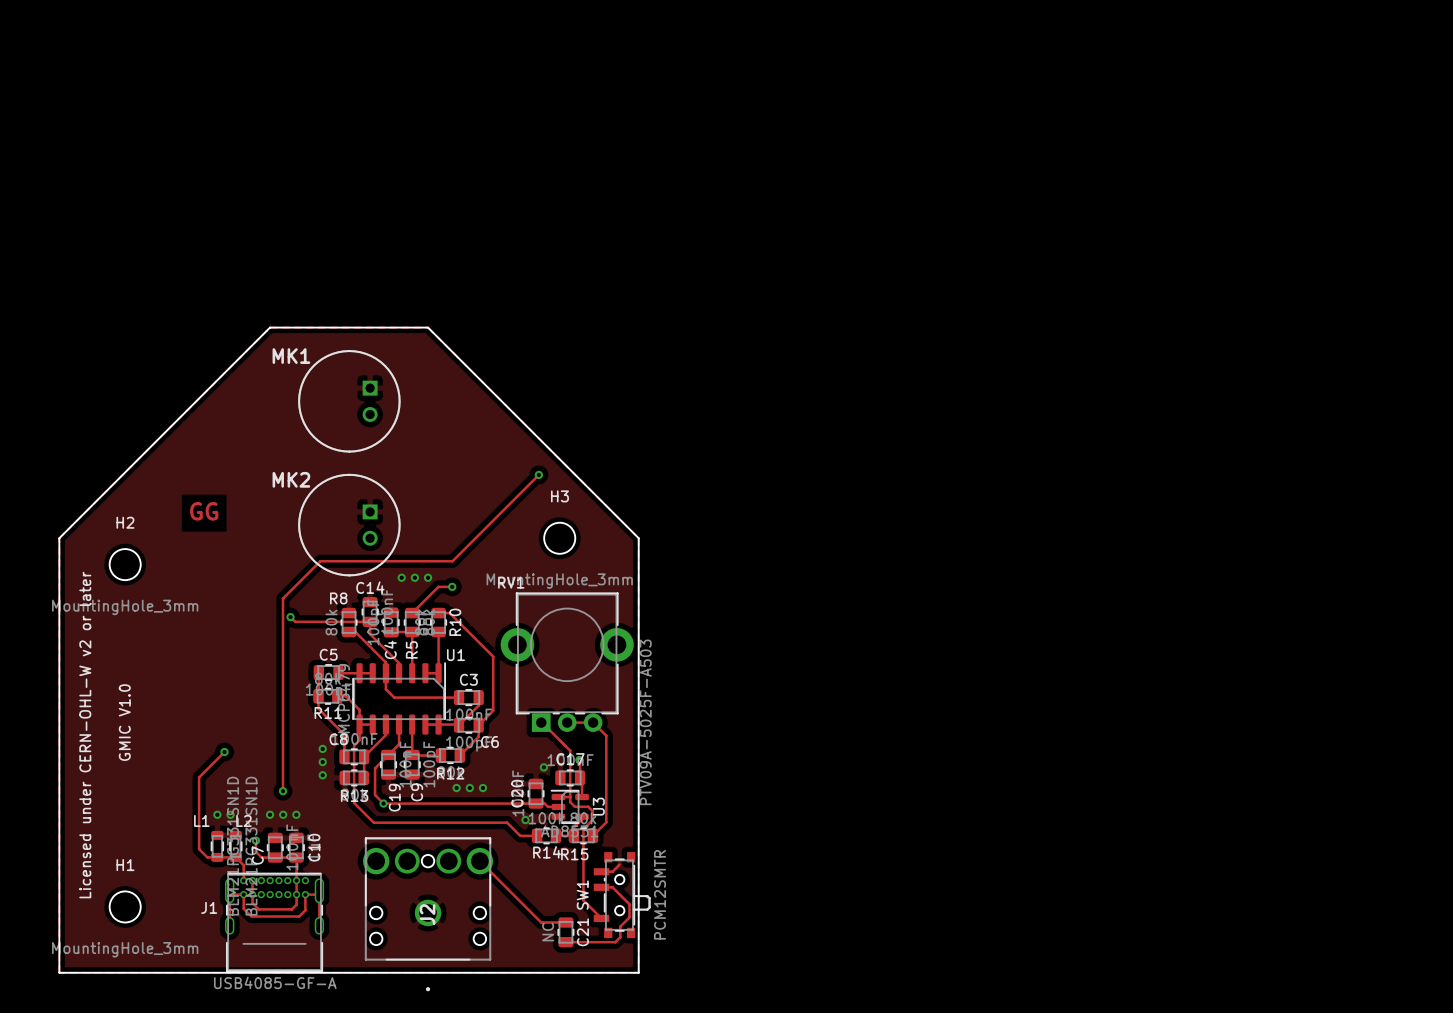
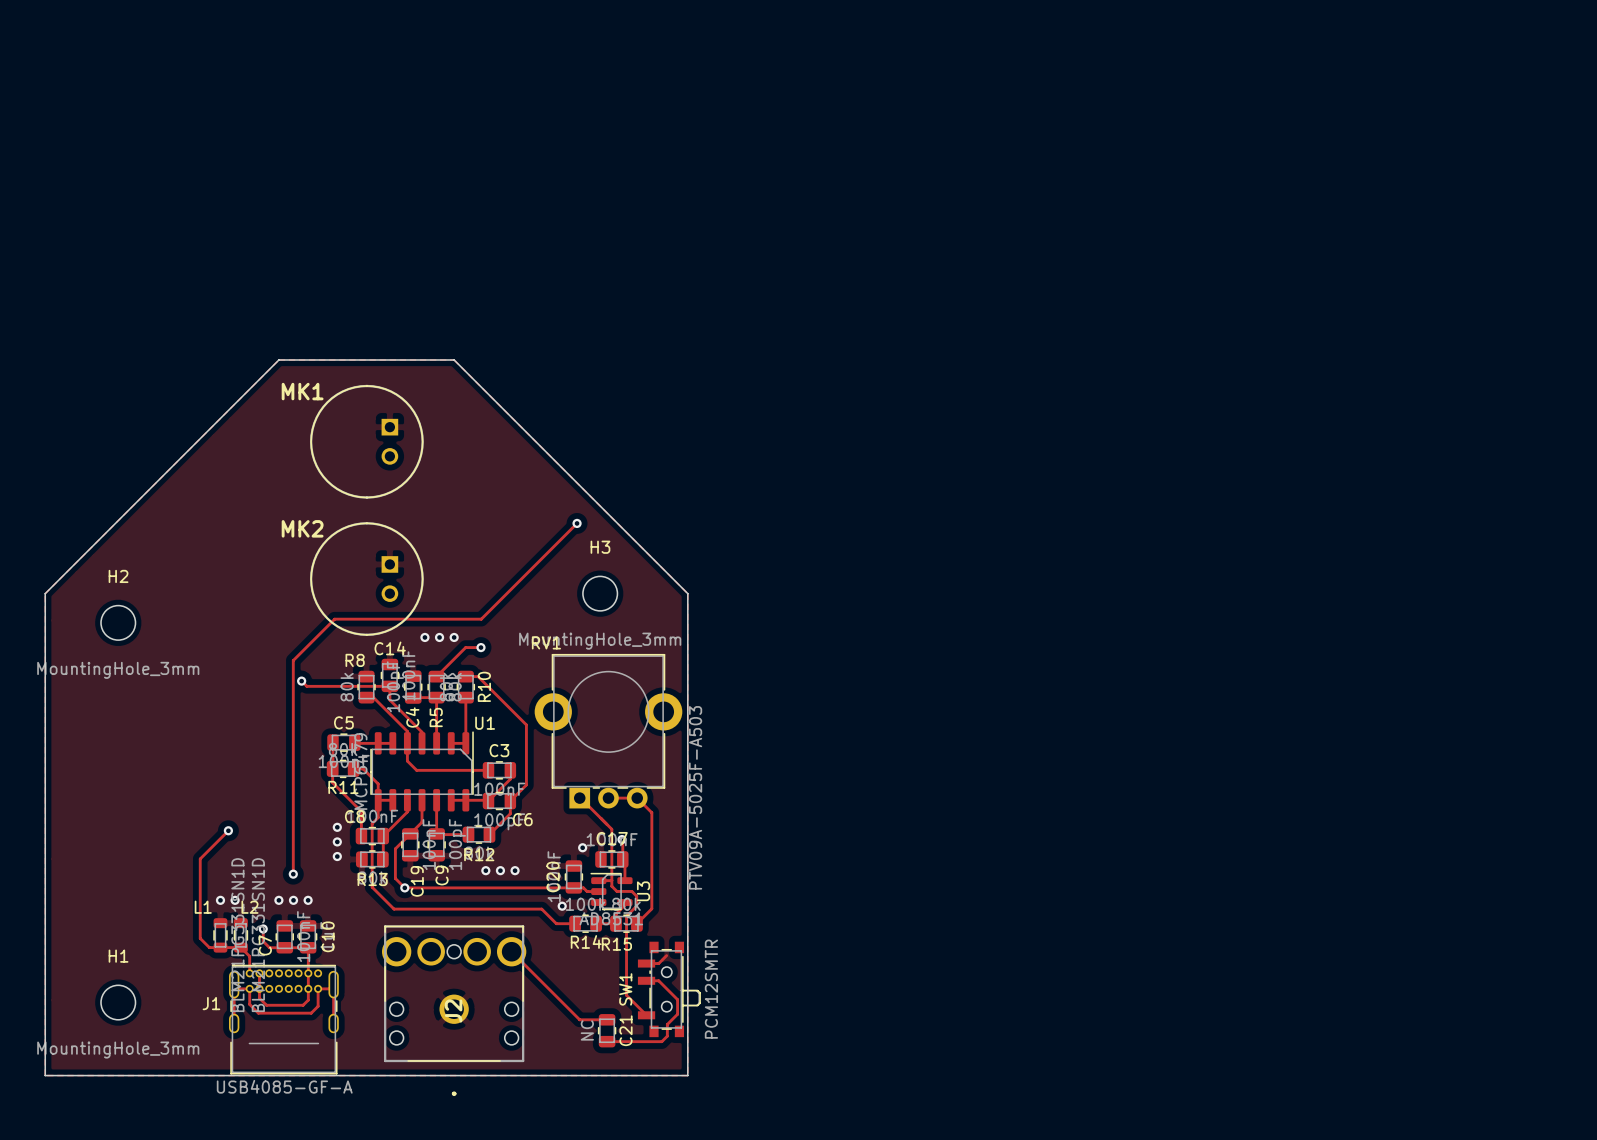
text: GG (204, 511) -> none
text: GMIC V1.0 (124, 722) -> none
text: Licensed under CERN-OHL-W v2 or later (85, 735) -> none

